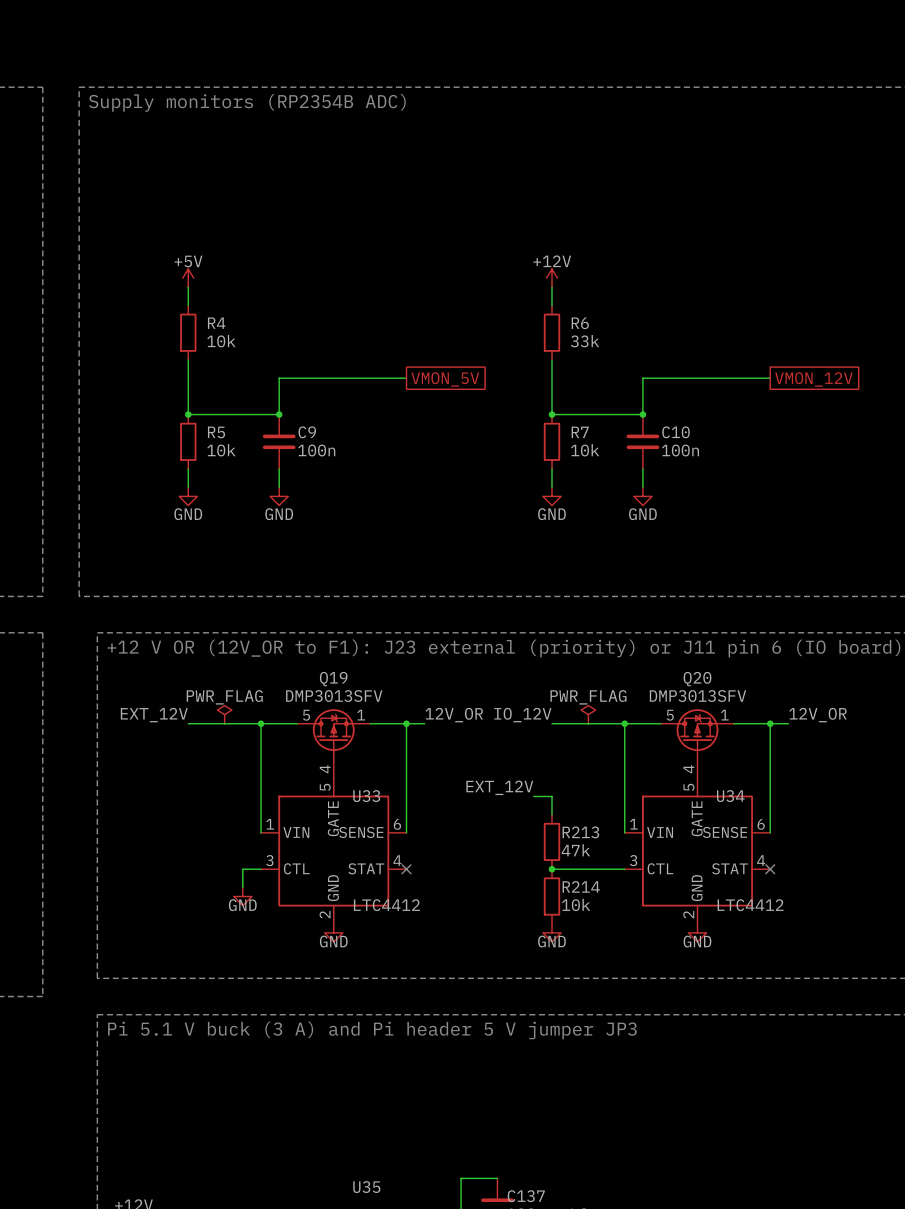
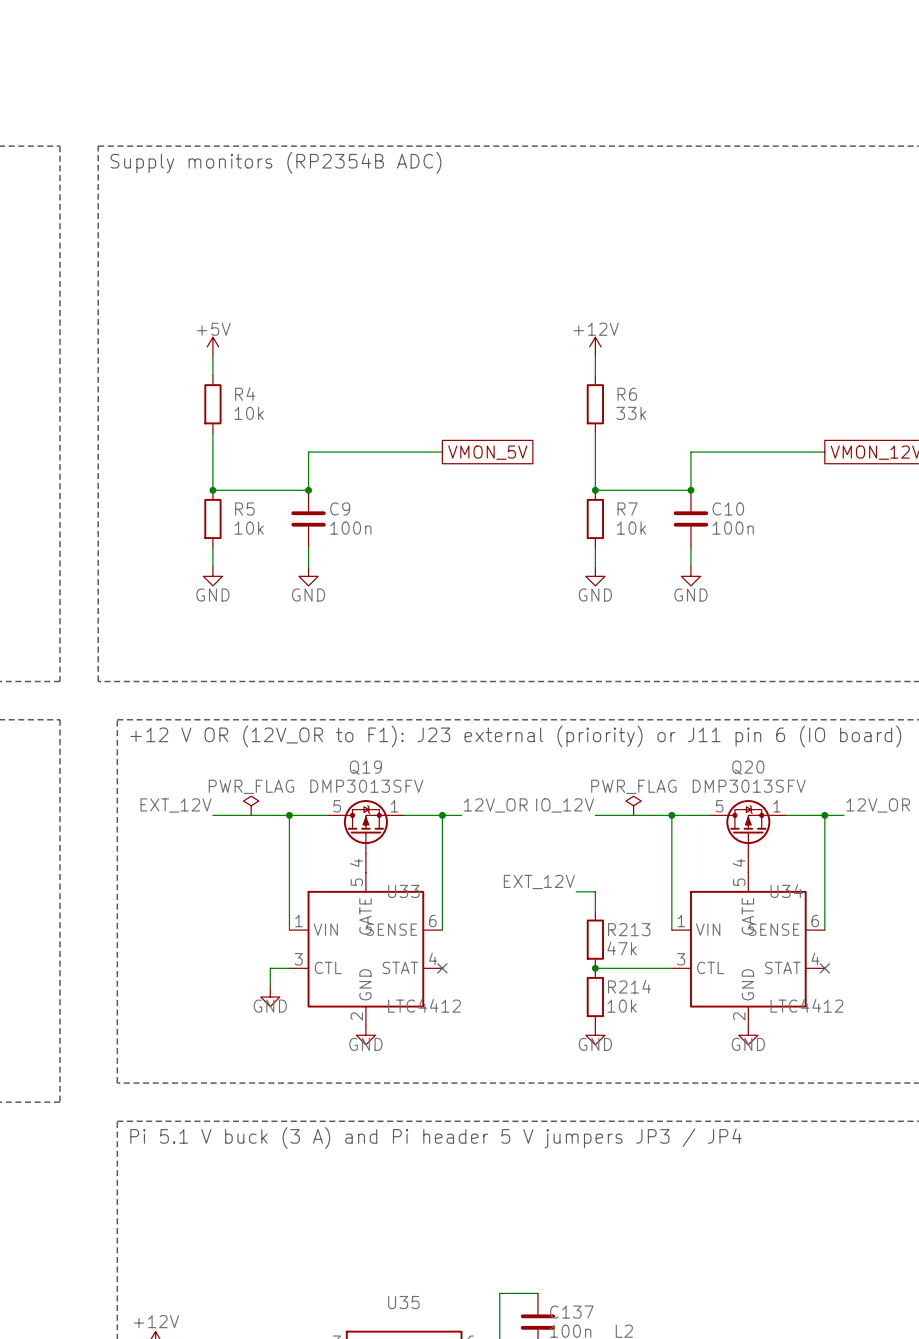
text: Pi 5.1 V buck (3 A) and Pi header 5 V jumper JP3 (372, 1030) -> Pi 5.1 V buck (3 A) and Pi header 5 V jumpers JP3 / JP4 (436, 1138)

